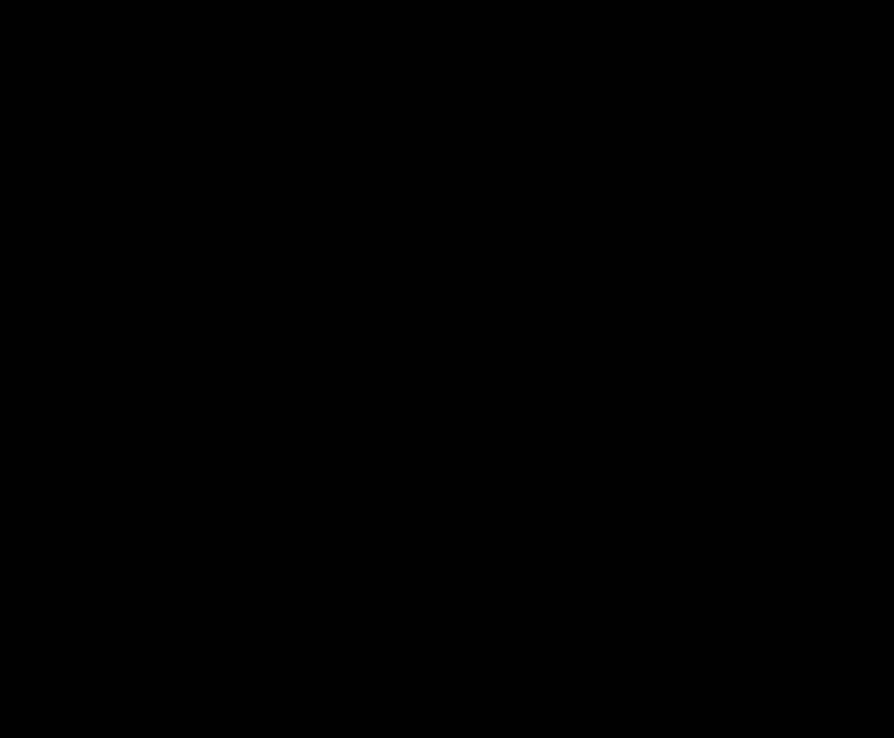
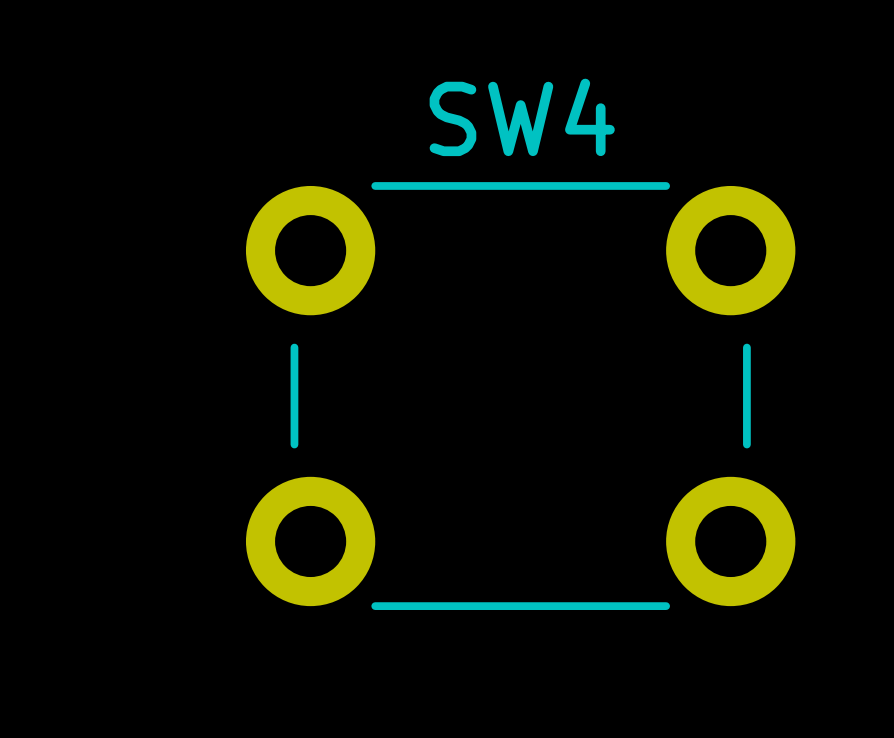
SW4: none -> (520, 396)

